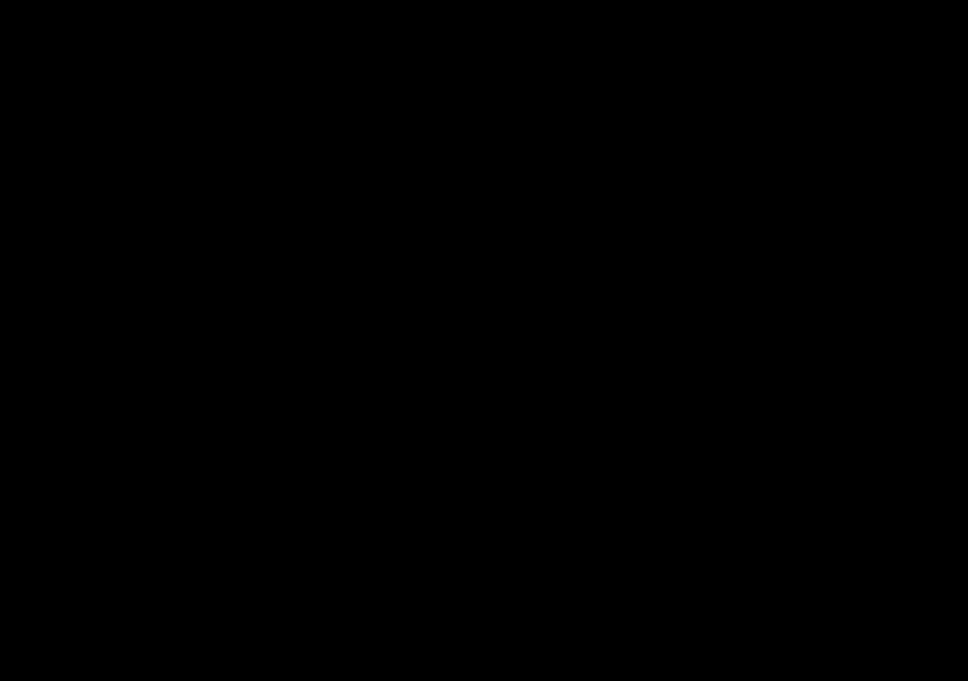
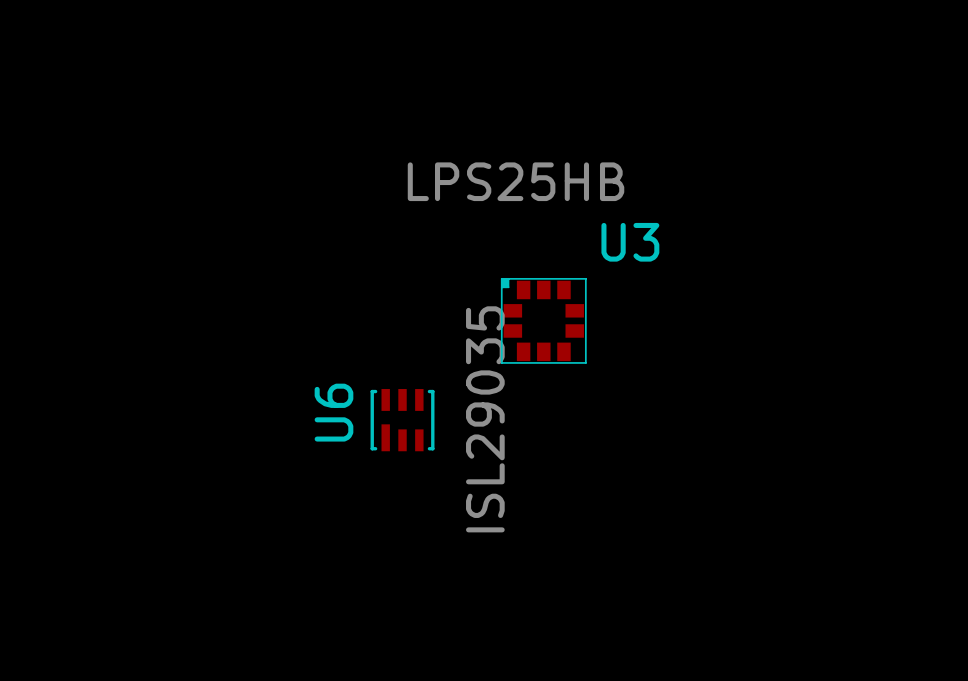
U3: none -> LPS25HB (543, 320)
U6: none -> ISL29035 (402, 420)

